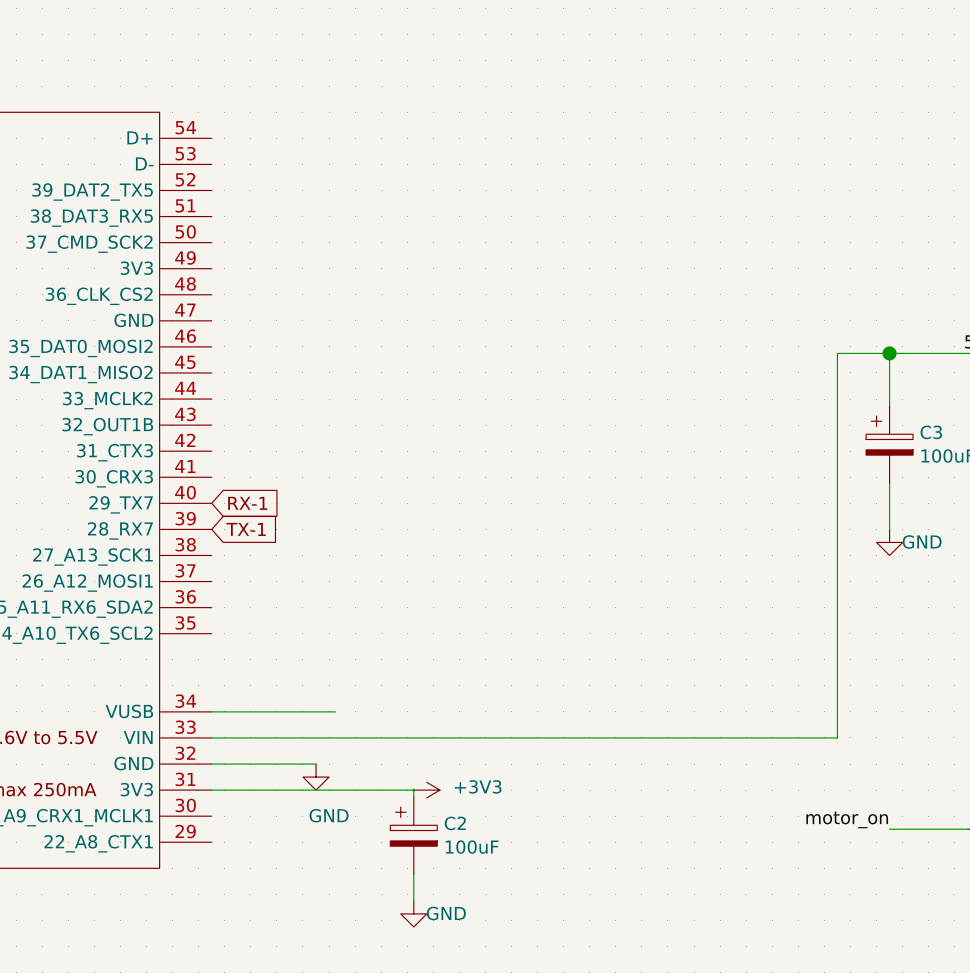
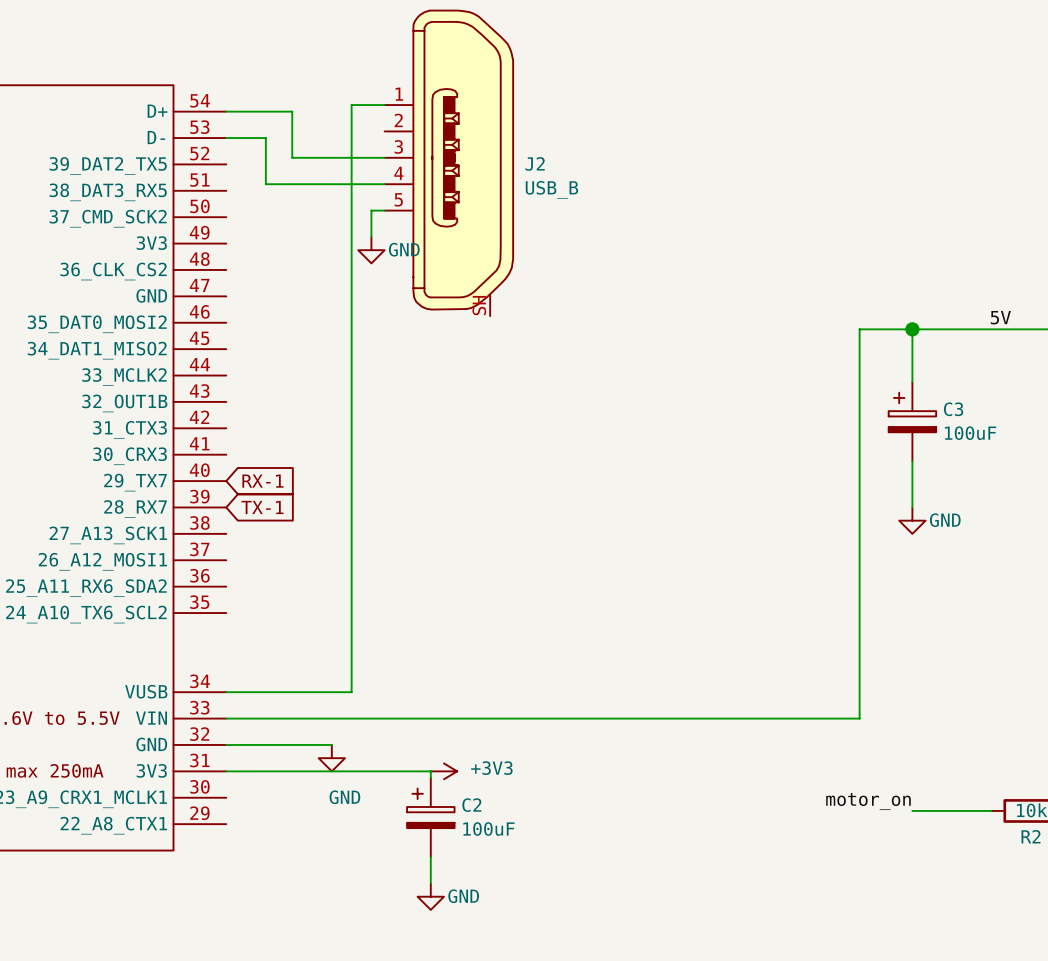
wire: none -> (384, 105) (351, 105) (351, 692)
wire: none -> (226, 111) (292, 111) (292, 157) (384, 157)
wire: none -> (226, 138) (265, 138) (265, 184) (384, 184)
J2: none -> USB_B (448, 163)
wire: none -> (384, 210) (371, 210) (371, 236)
power symbol: none -> GND (371, 250)

